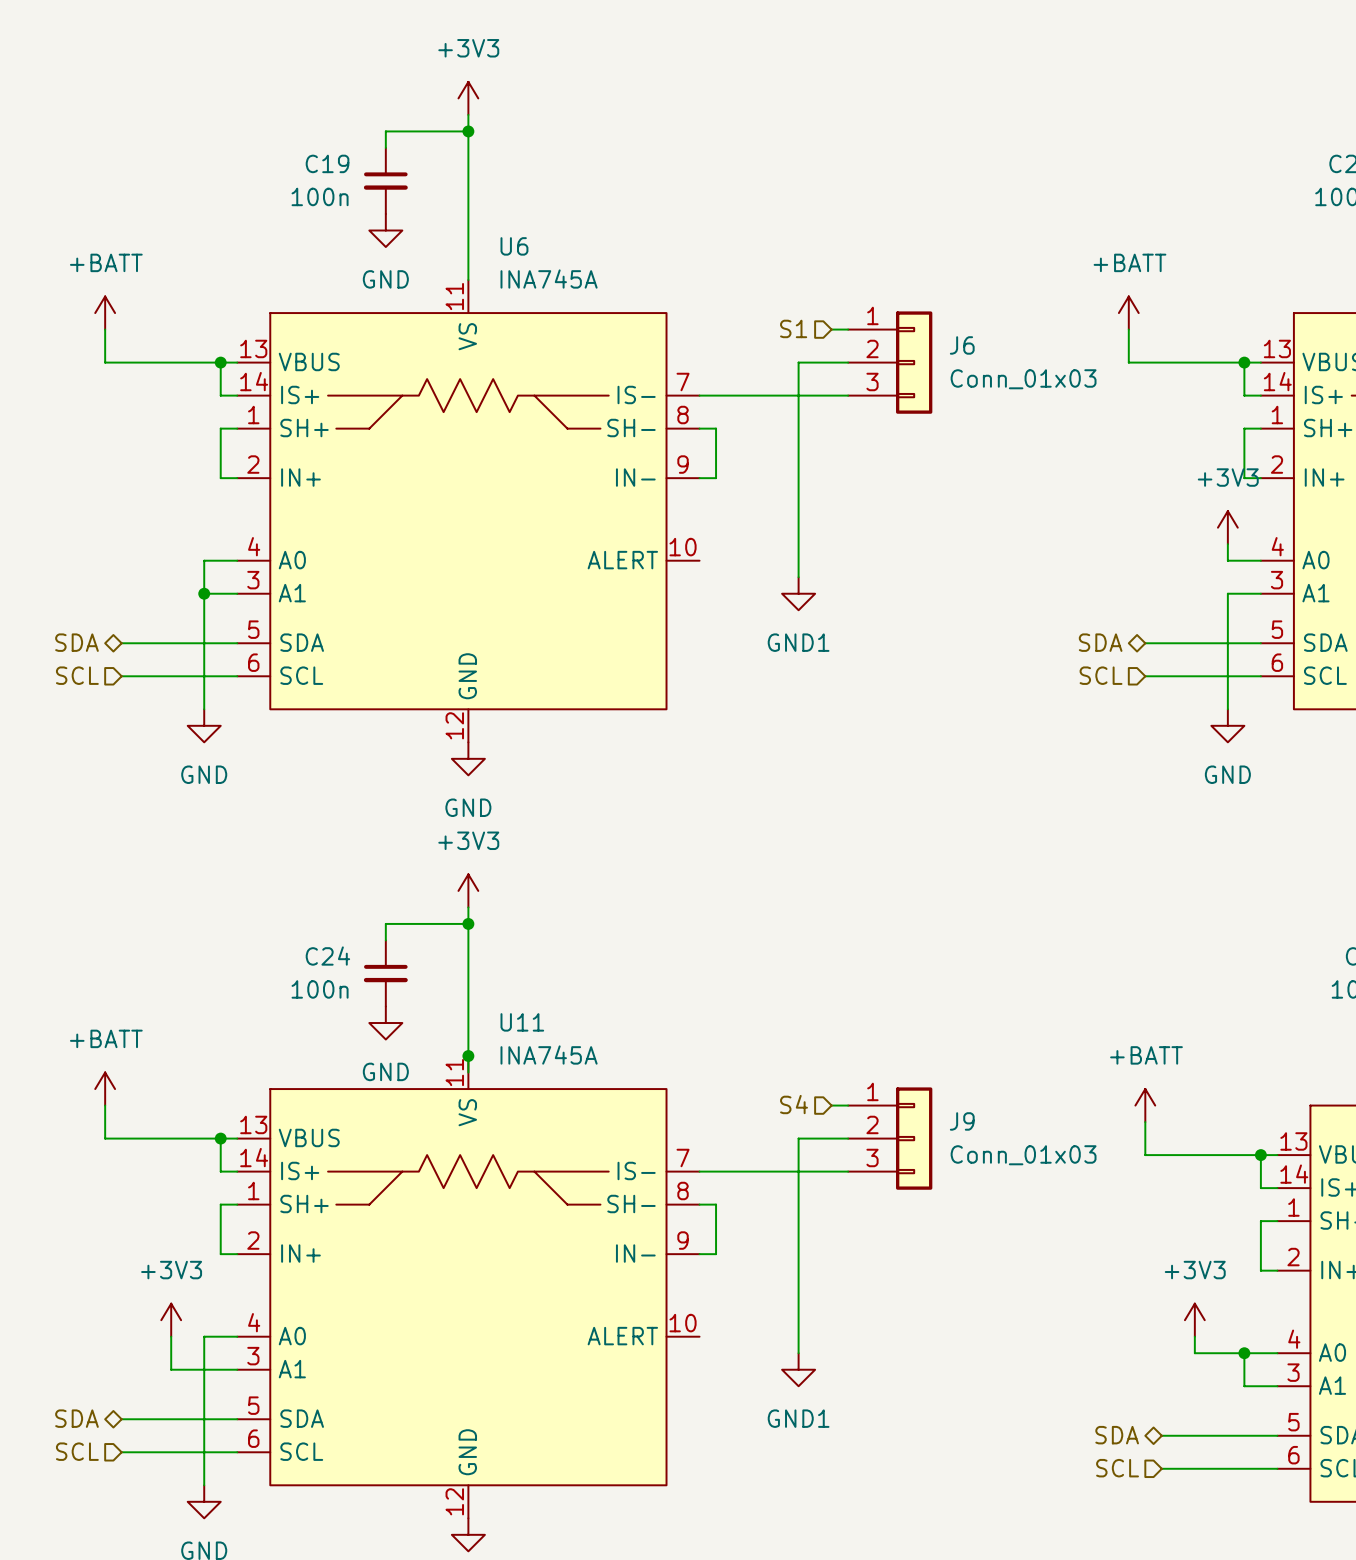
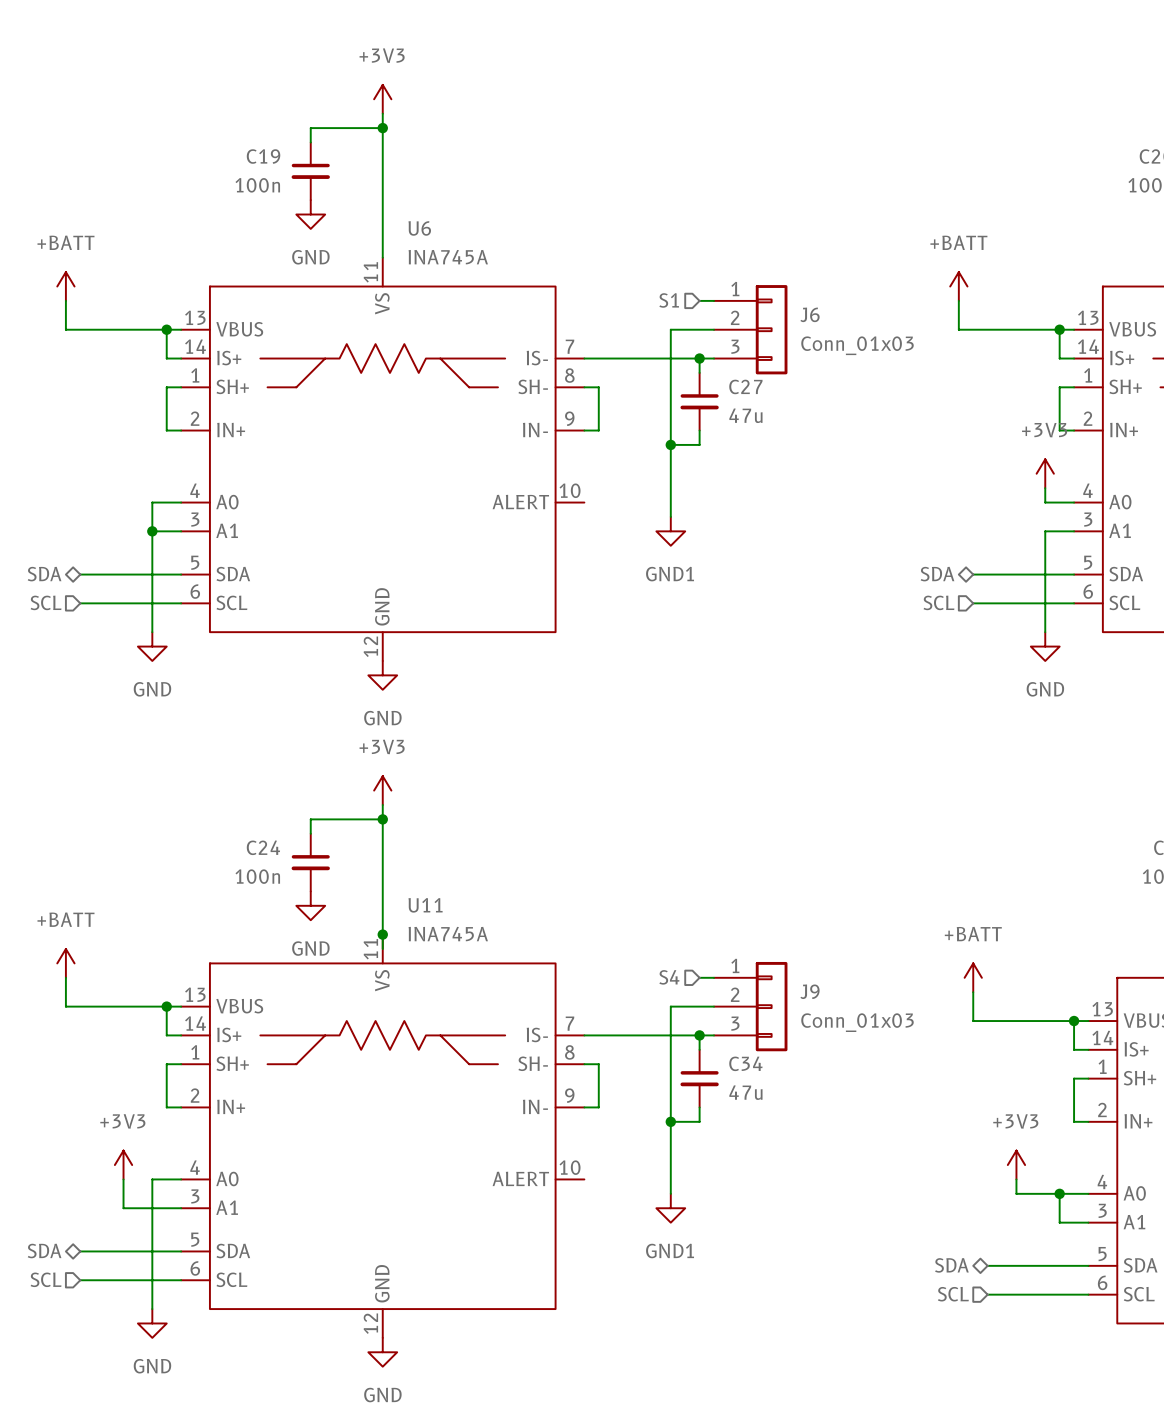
wire: none -> (699, 358) (699, 372)
junction: none -> (699, 358)
C27: none -> 47u (699, 401)
wire: none -> (699, 430) (699, 444) (670, 444)
junction: none -> (670, 444)
wire: none -> (699, 1035) (699, 1049)
junction: none -> (699, 1035)
C34: none -> 47u (699, 1078)
wire: none -> (699, 1107) (699, 1121) (670, 1121)
junction: none -> (670, 1121)

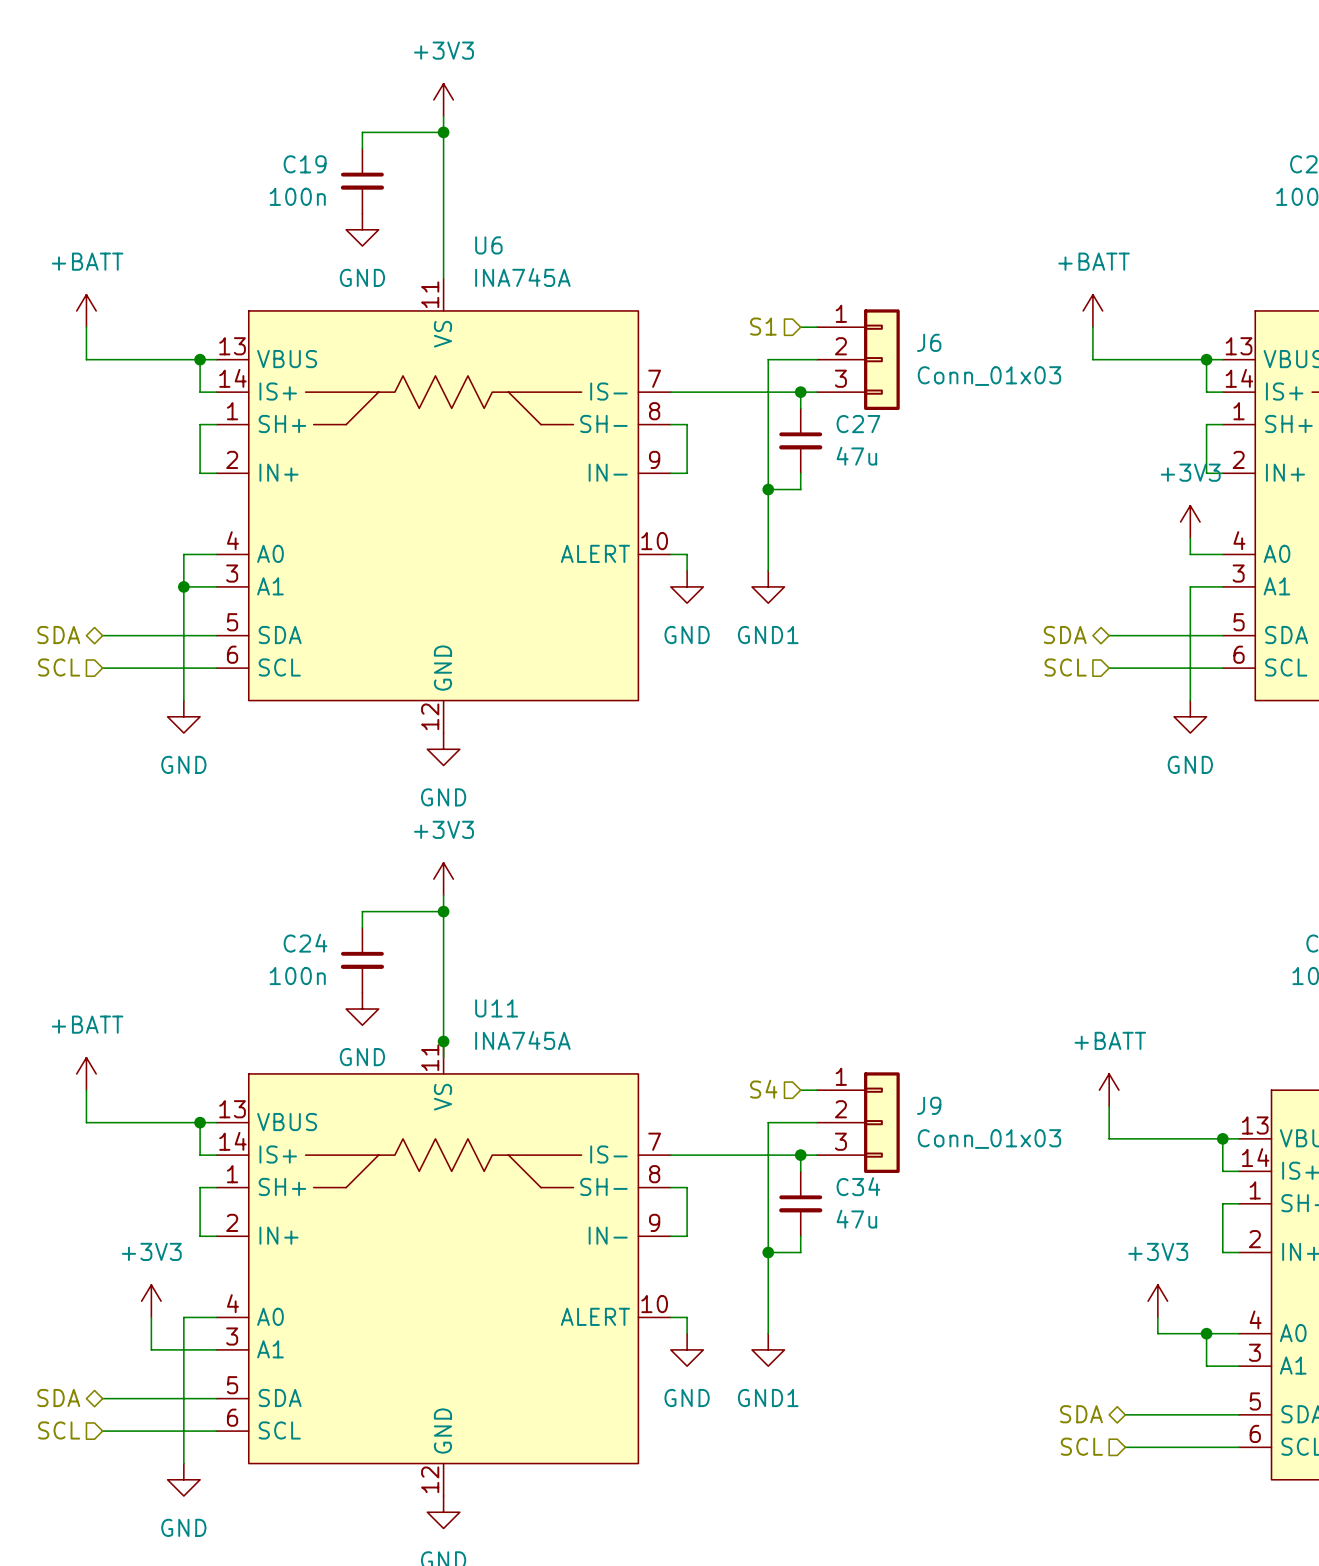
wire: none -> (670, 554) (687, 554) (687, 570)
power symbol: none -> GND (687, 586)
wire: none -> (670, 1317) (687, 1317) (687, 1333)
power symbol: none -> GND (687, 1349)

